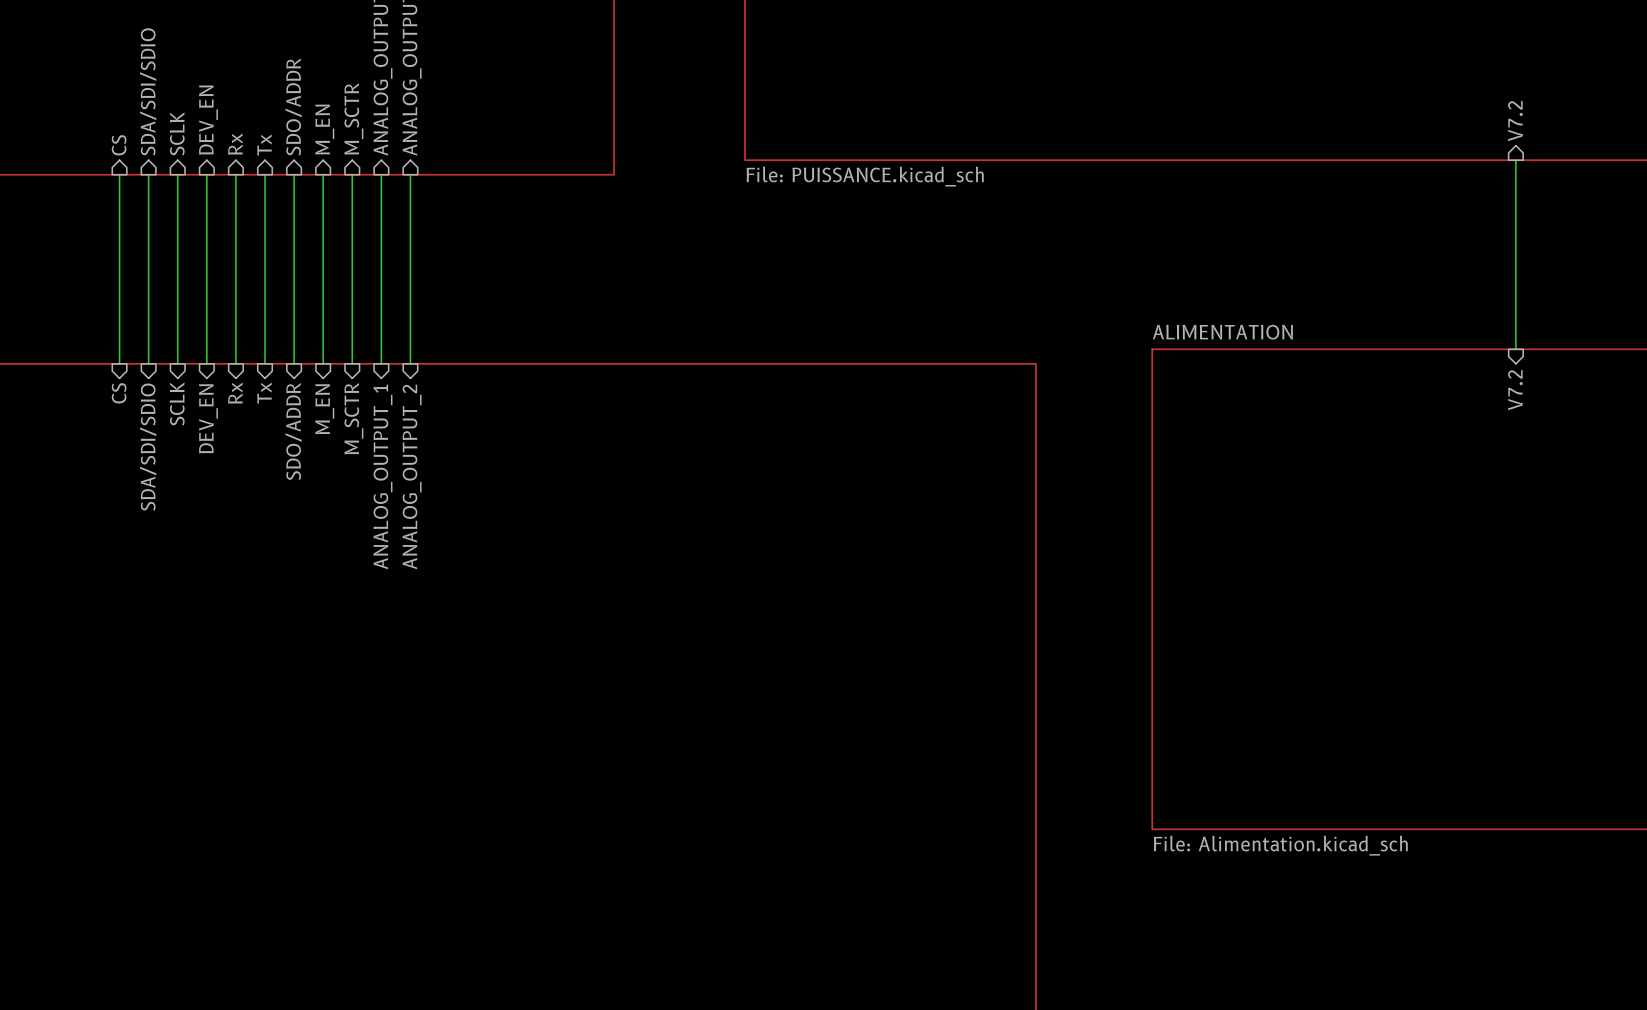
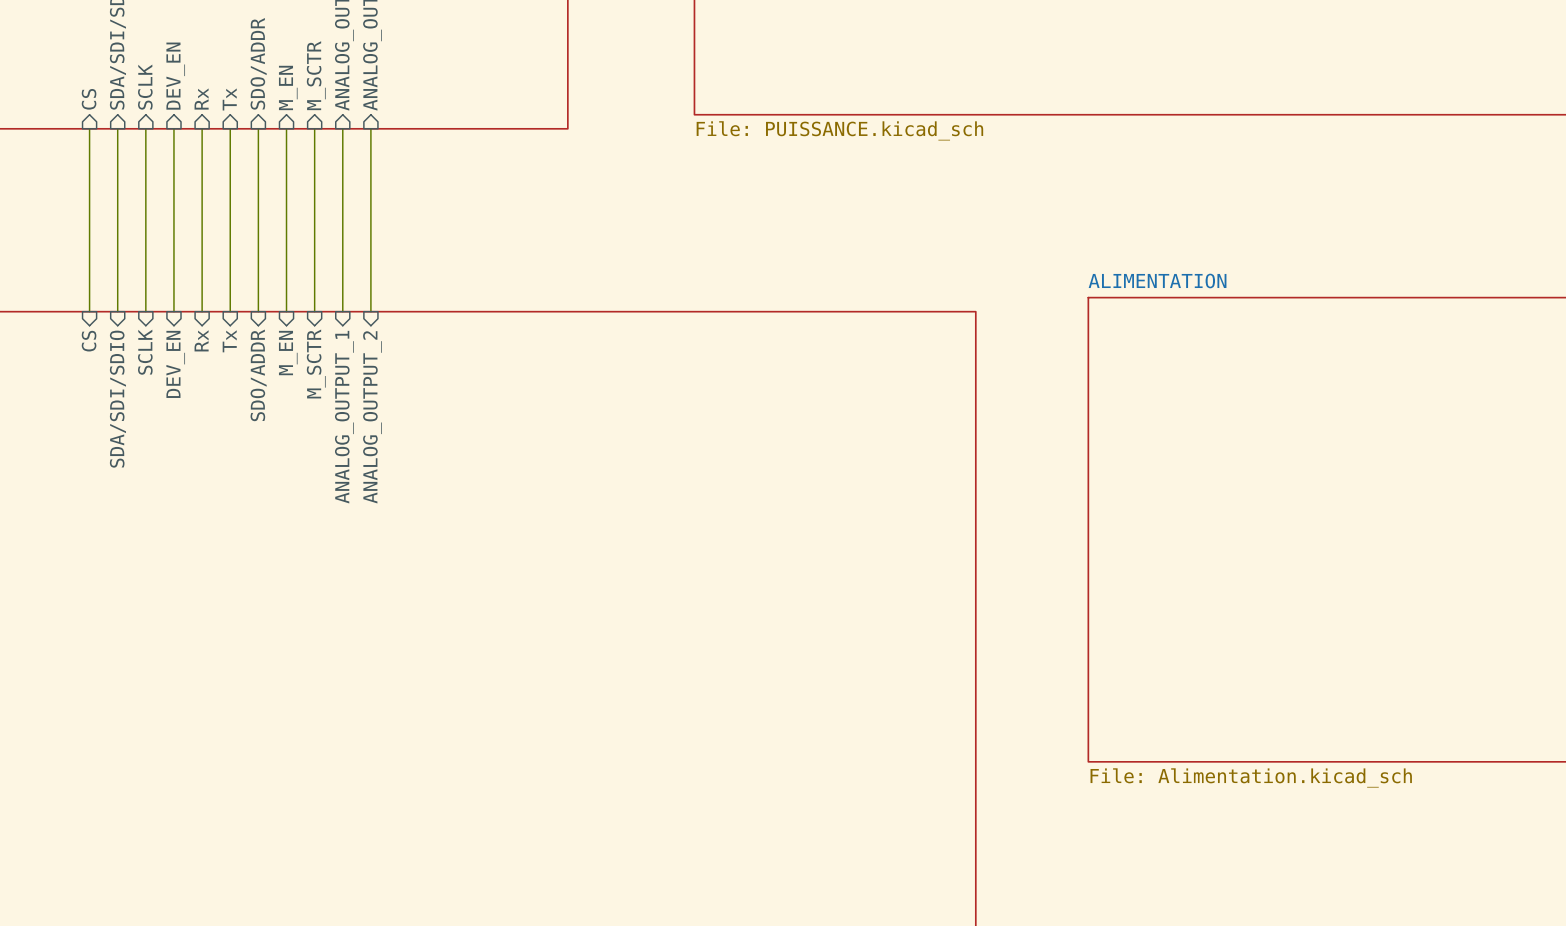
sheet pin: V7.2 (1515, 121) -> none
wire: (1515, 160) (1515, 349) -> none
sheet pin: V7.2 (1515, 390) -> none

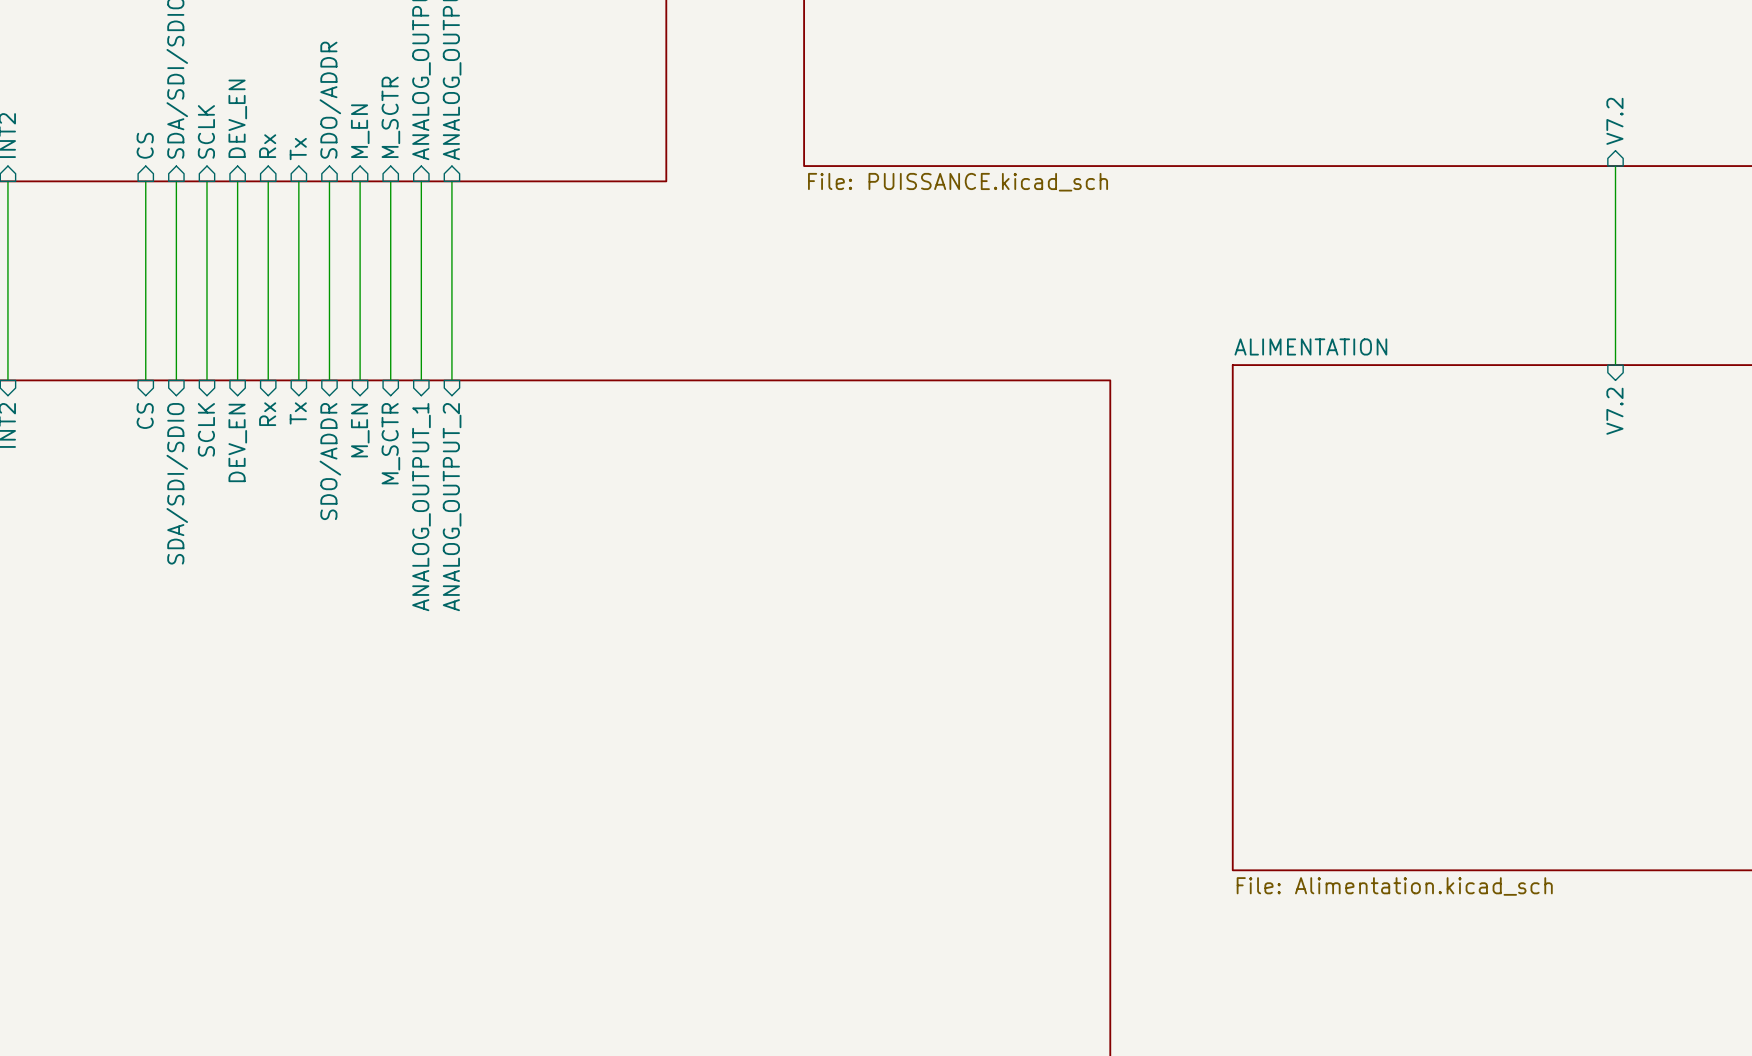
sheet pin: none -> V7.2 (1614, 121)
wire: none -> (1615, 166) (1615, 365)
sheet pin: none -> V7.2 (1614, 411)

